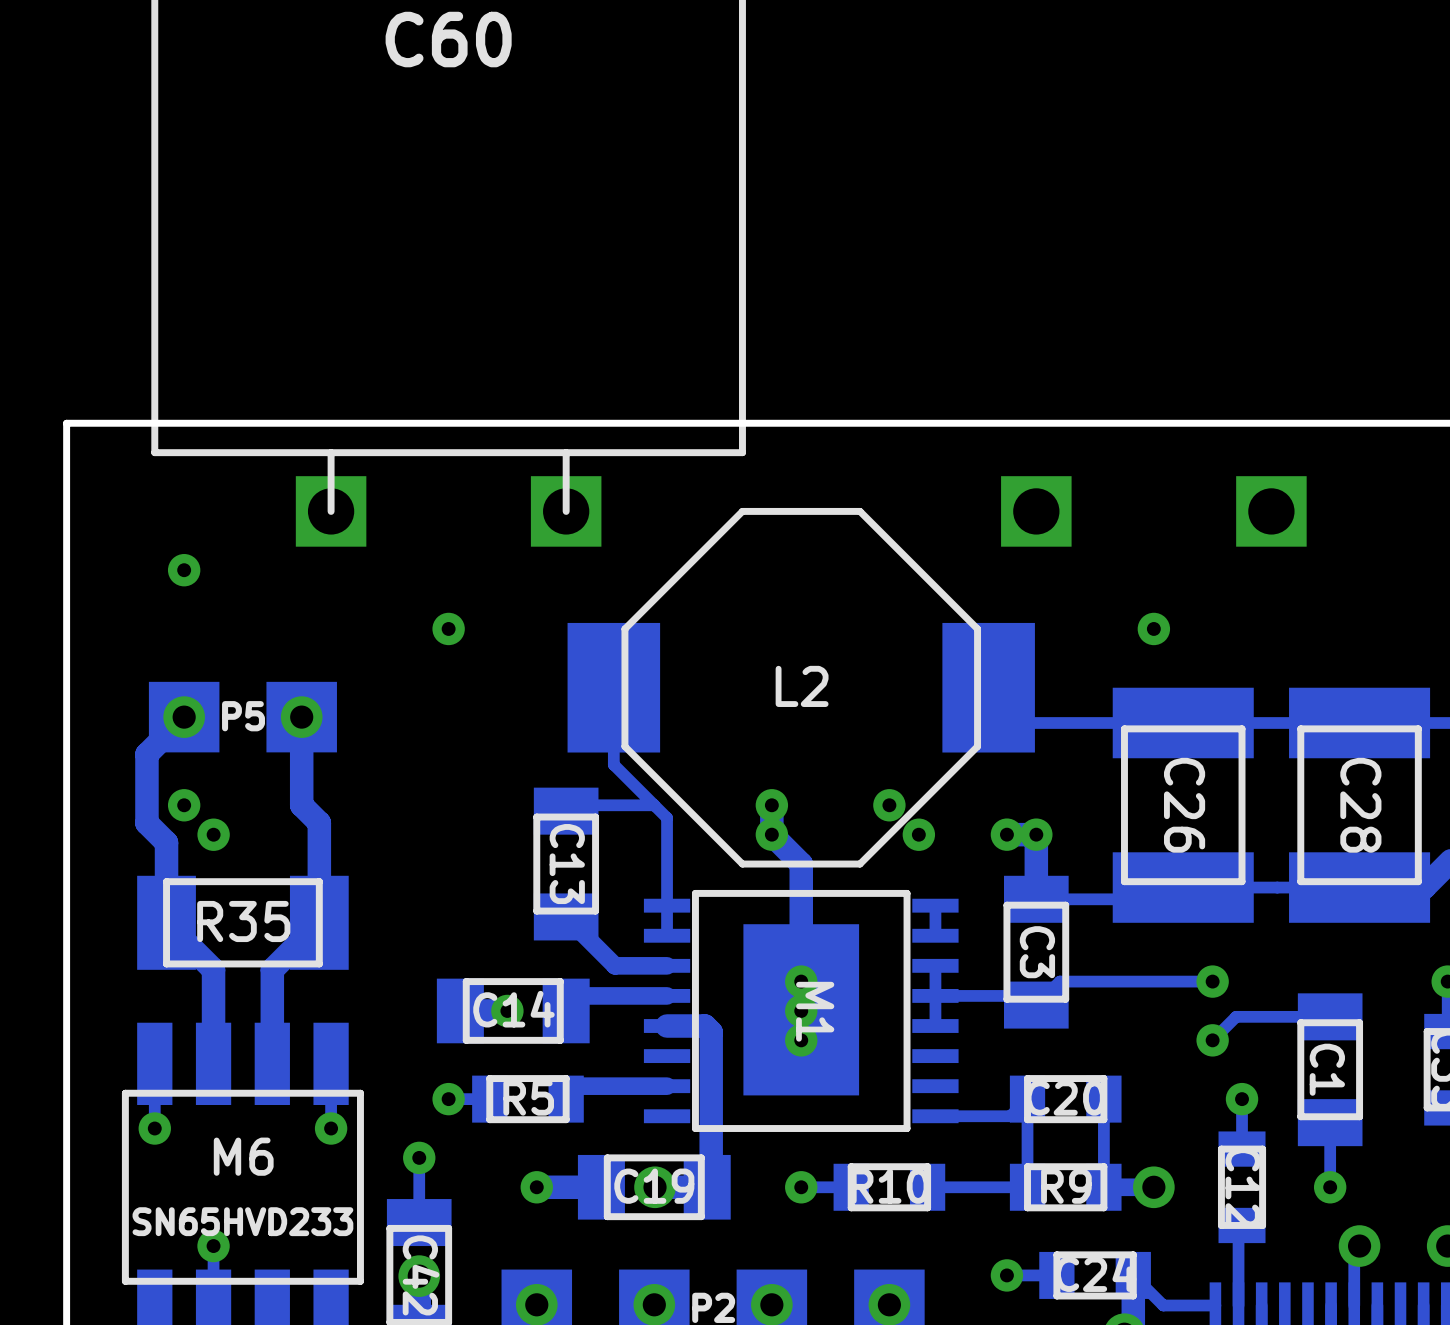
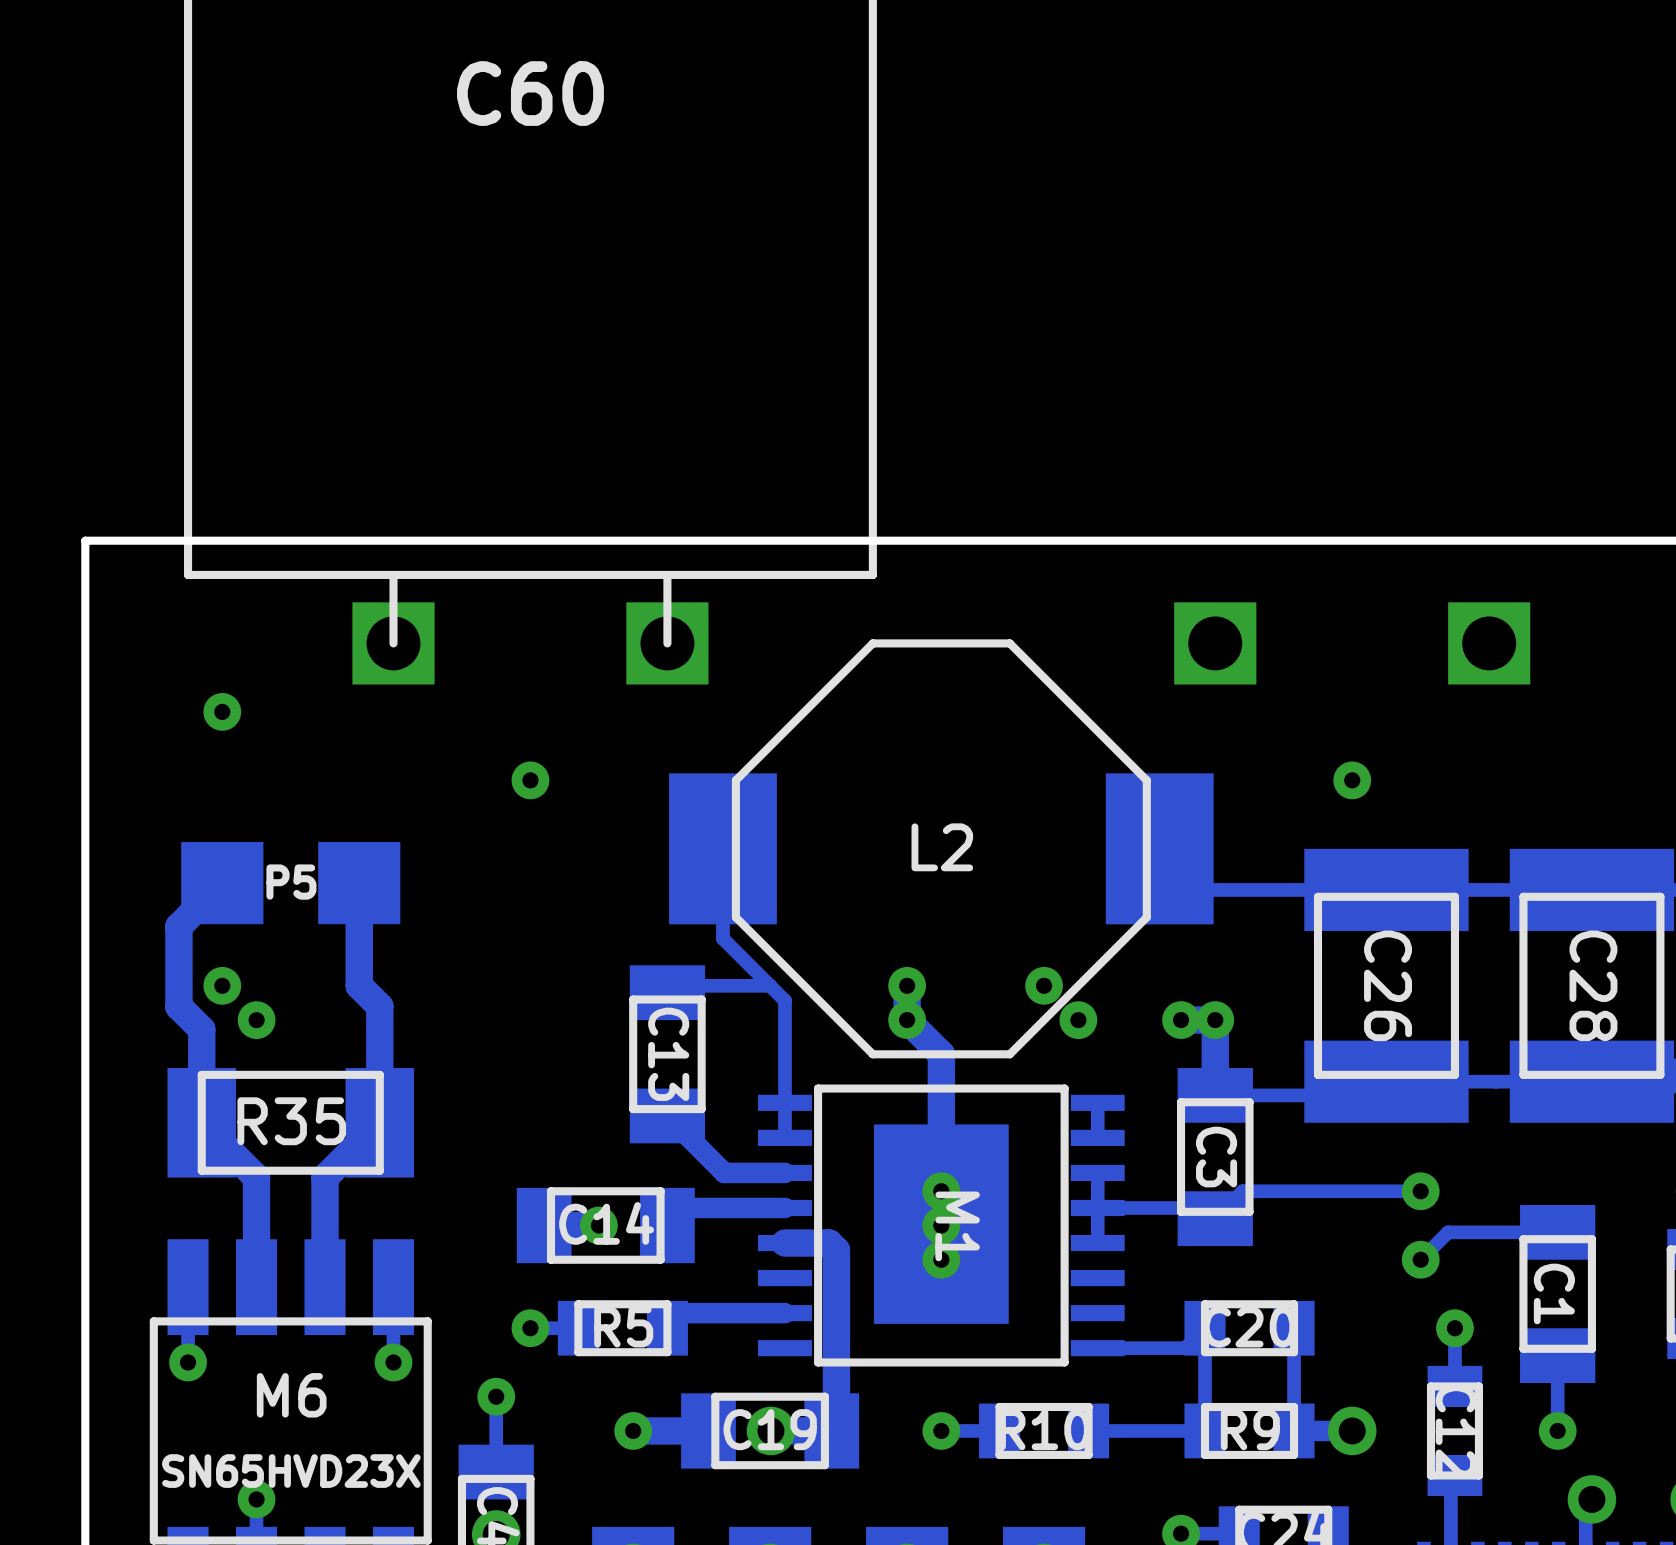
via: (184, 717) -> none
via: (301, 717) -> none
M6 value: SN65HVD233 (242, 1221) -> SN65HVD23X (291, 1471)

